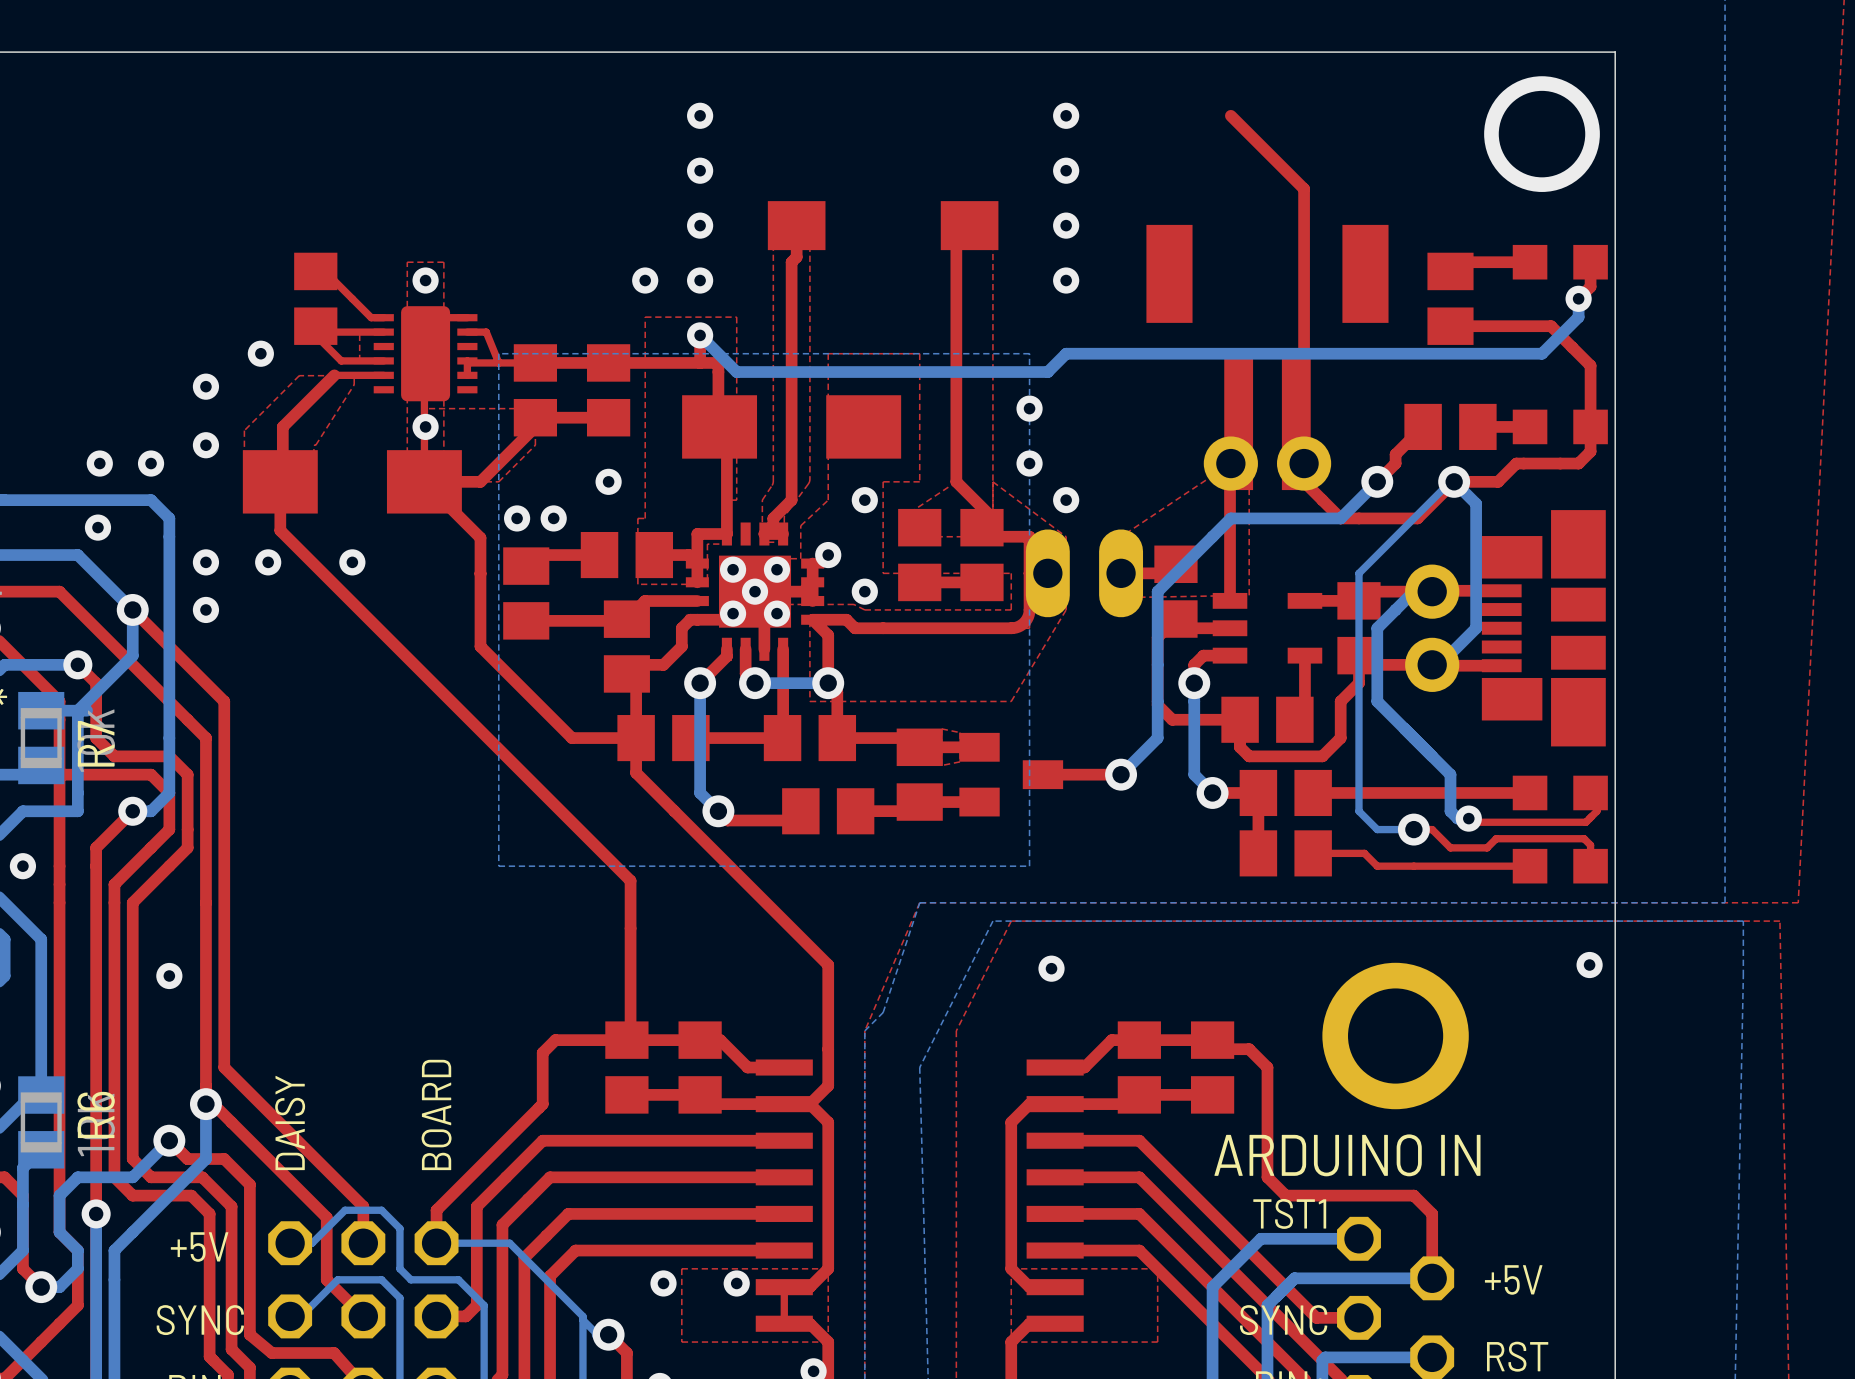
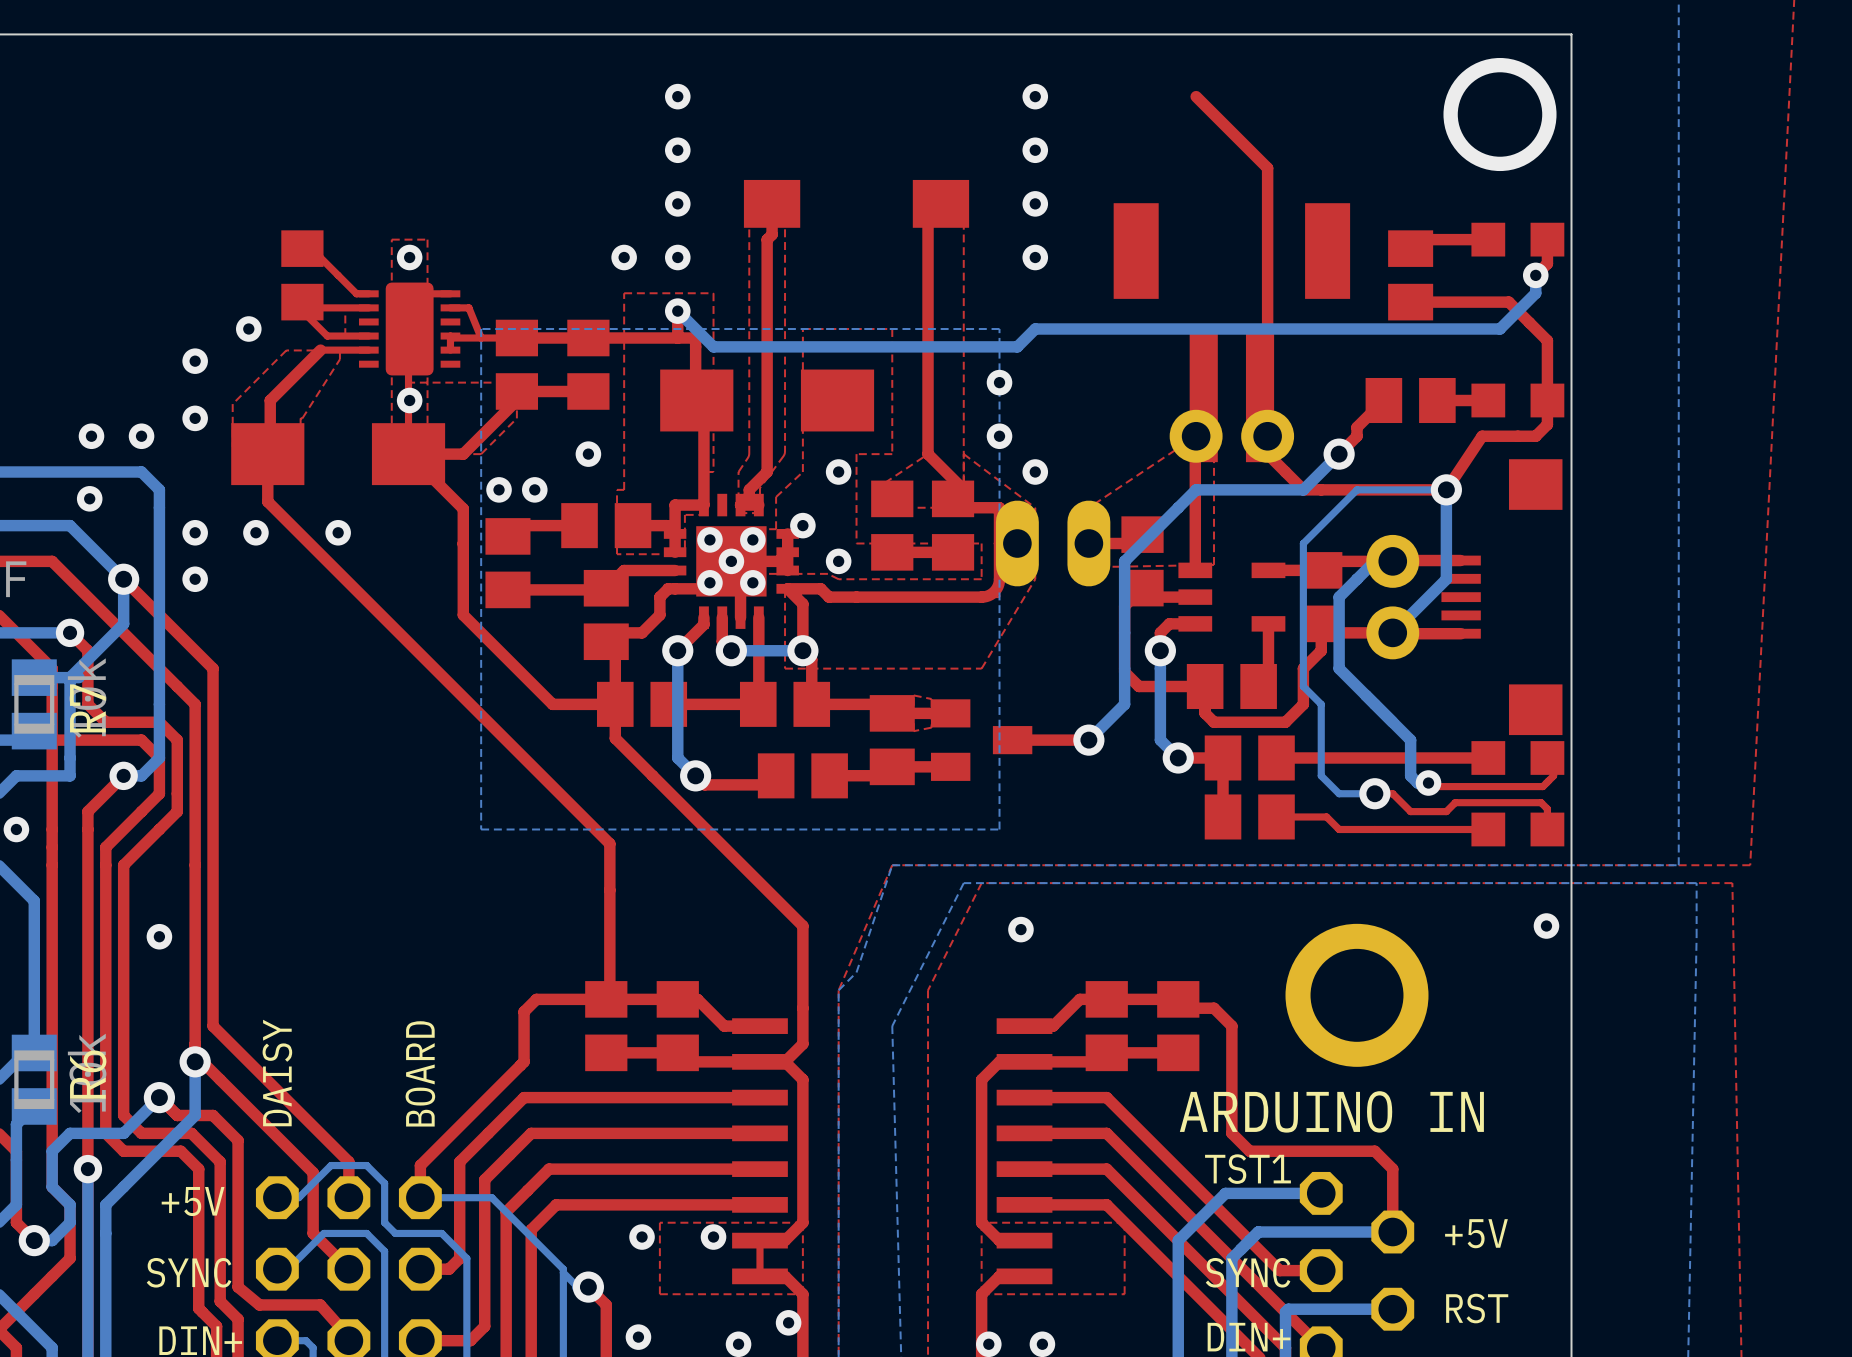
top track: (1523, 463) (1516, 463) (1498, 481) (1454, 481) (1417, 518) -> (1482, 436) (1446, 489) (1378, 489)
via position: (1454, 481) -> (1446, 489)
part footprint: [1481, 510, 1606, 747] -> [1441, 459, 1563, 736]
bottom track: (1432, 664) (1439, 664) (1476, 628) (1476, 503) (1454, 481) (1450, 481) (1358, 573) (1358, 738) -> (1392, 632) (1446, 579) (1446, 489) (1357, 489) (1303, 543) (1303, 686) (1321, 704)

